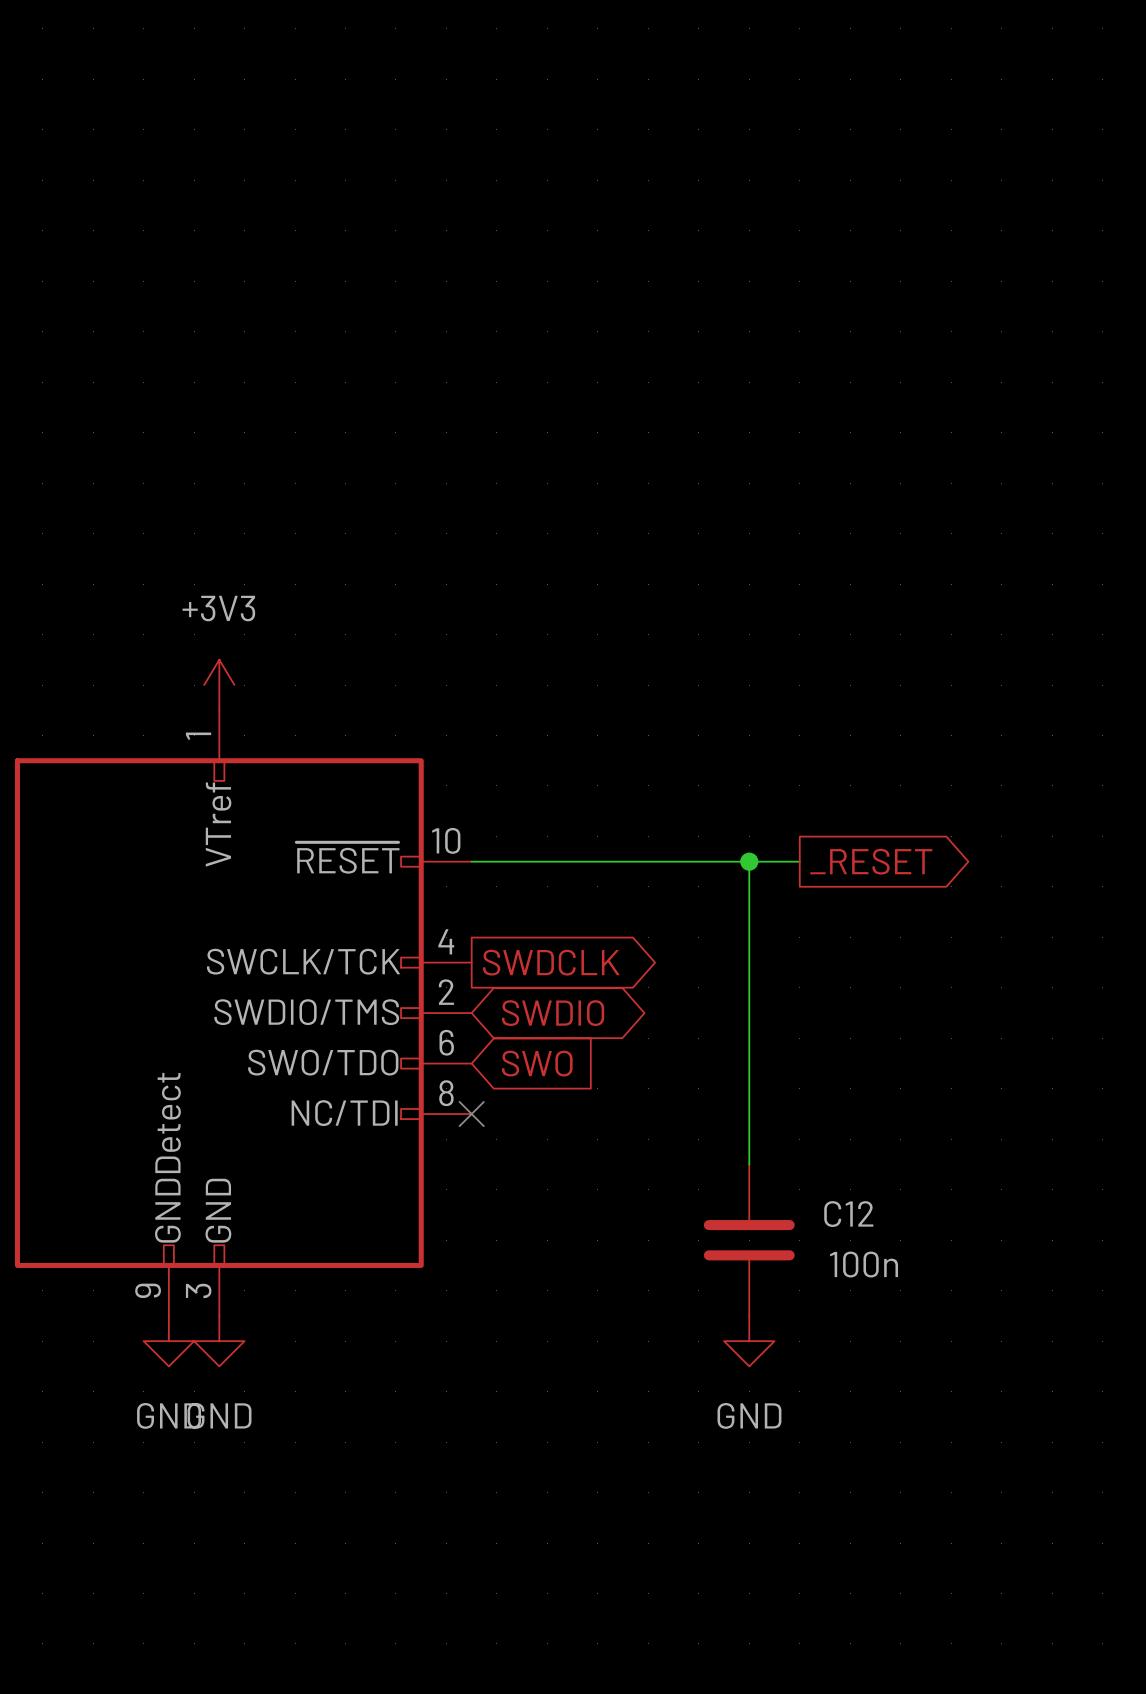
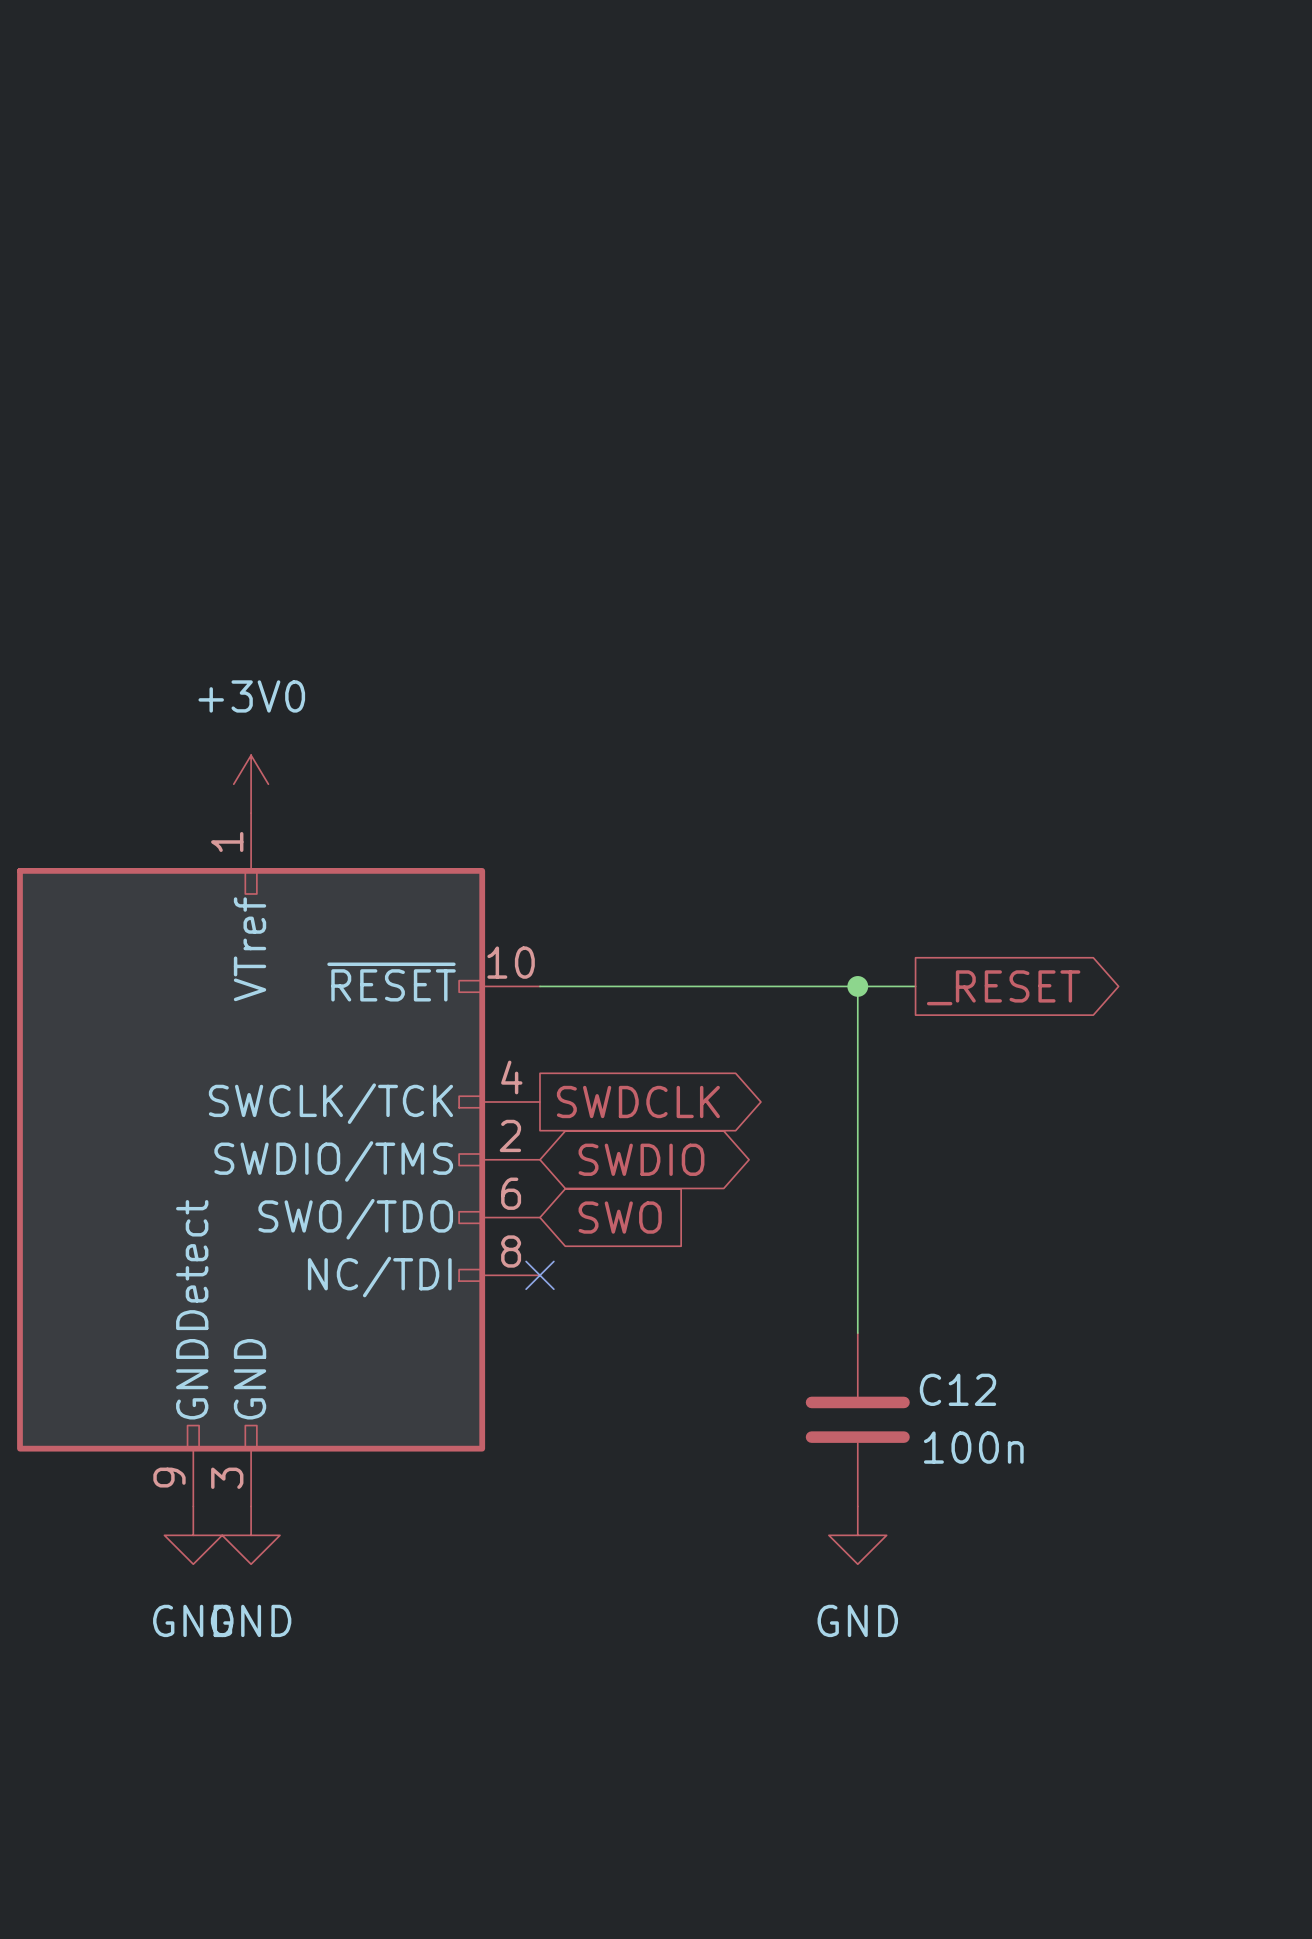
power symbol: +3V3 (219, 685) -> +3V0 (251, 784)

